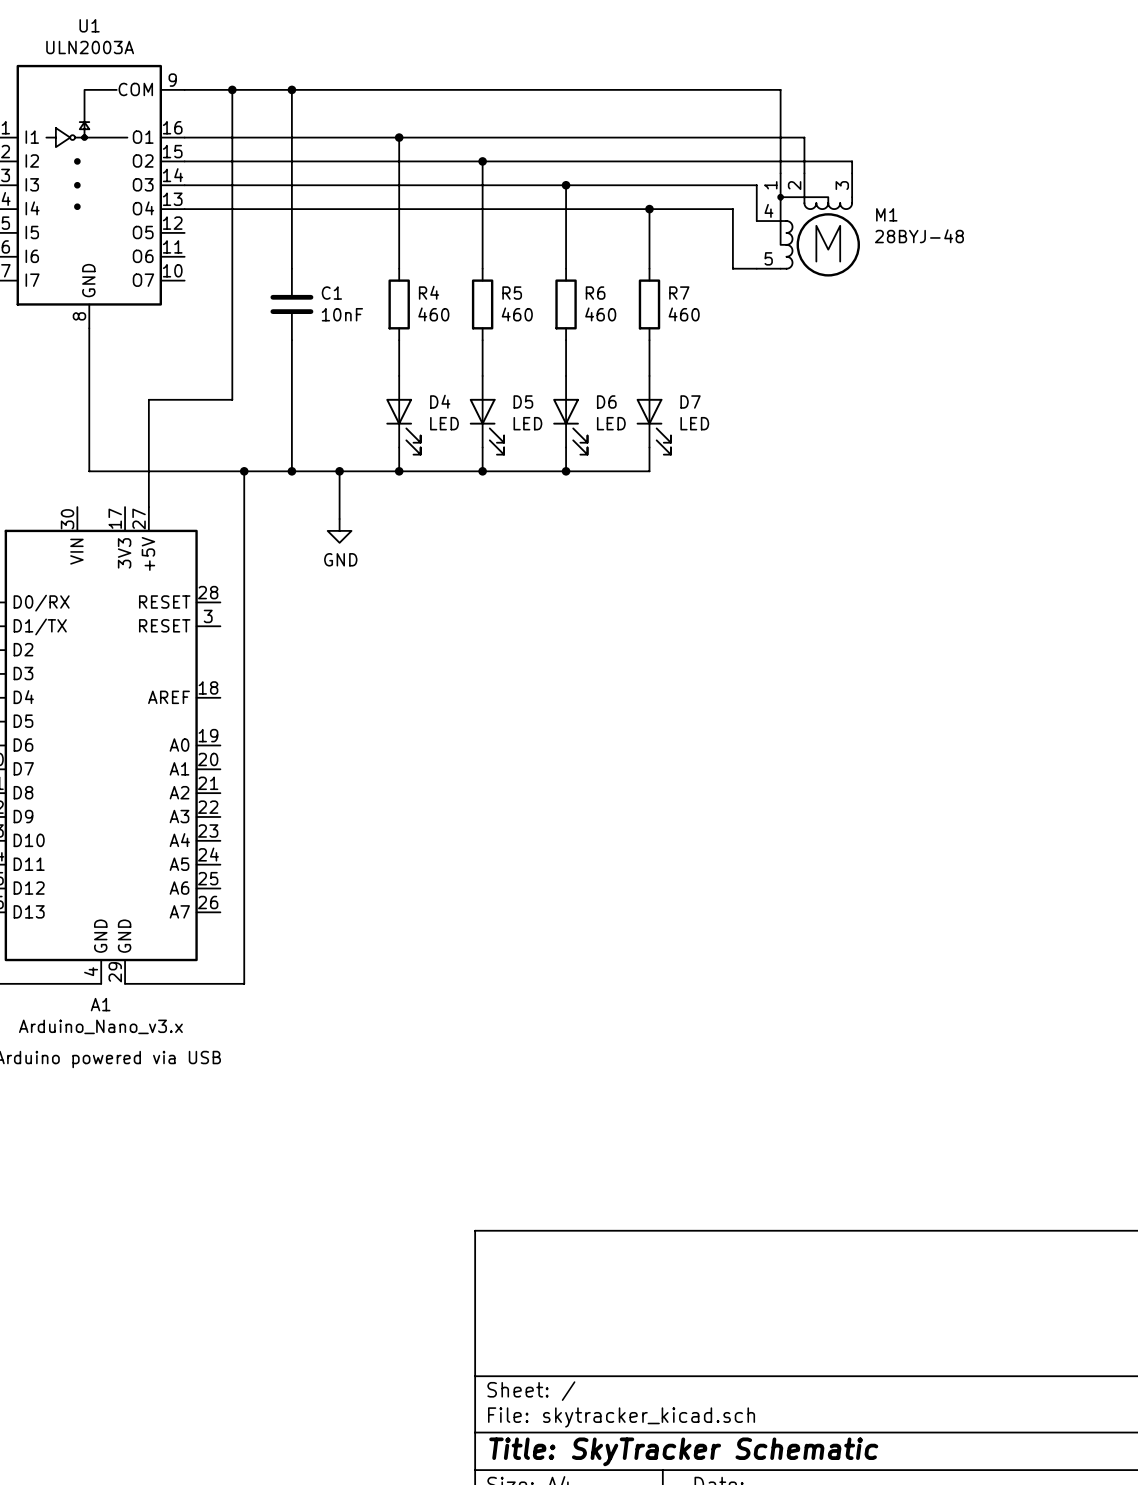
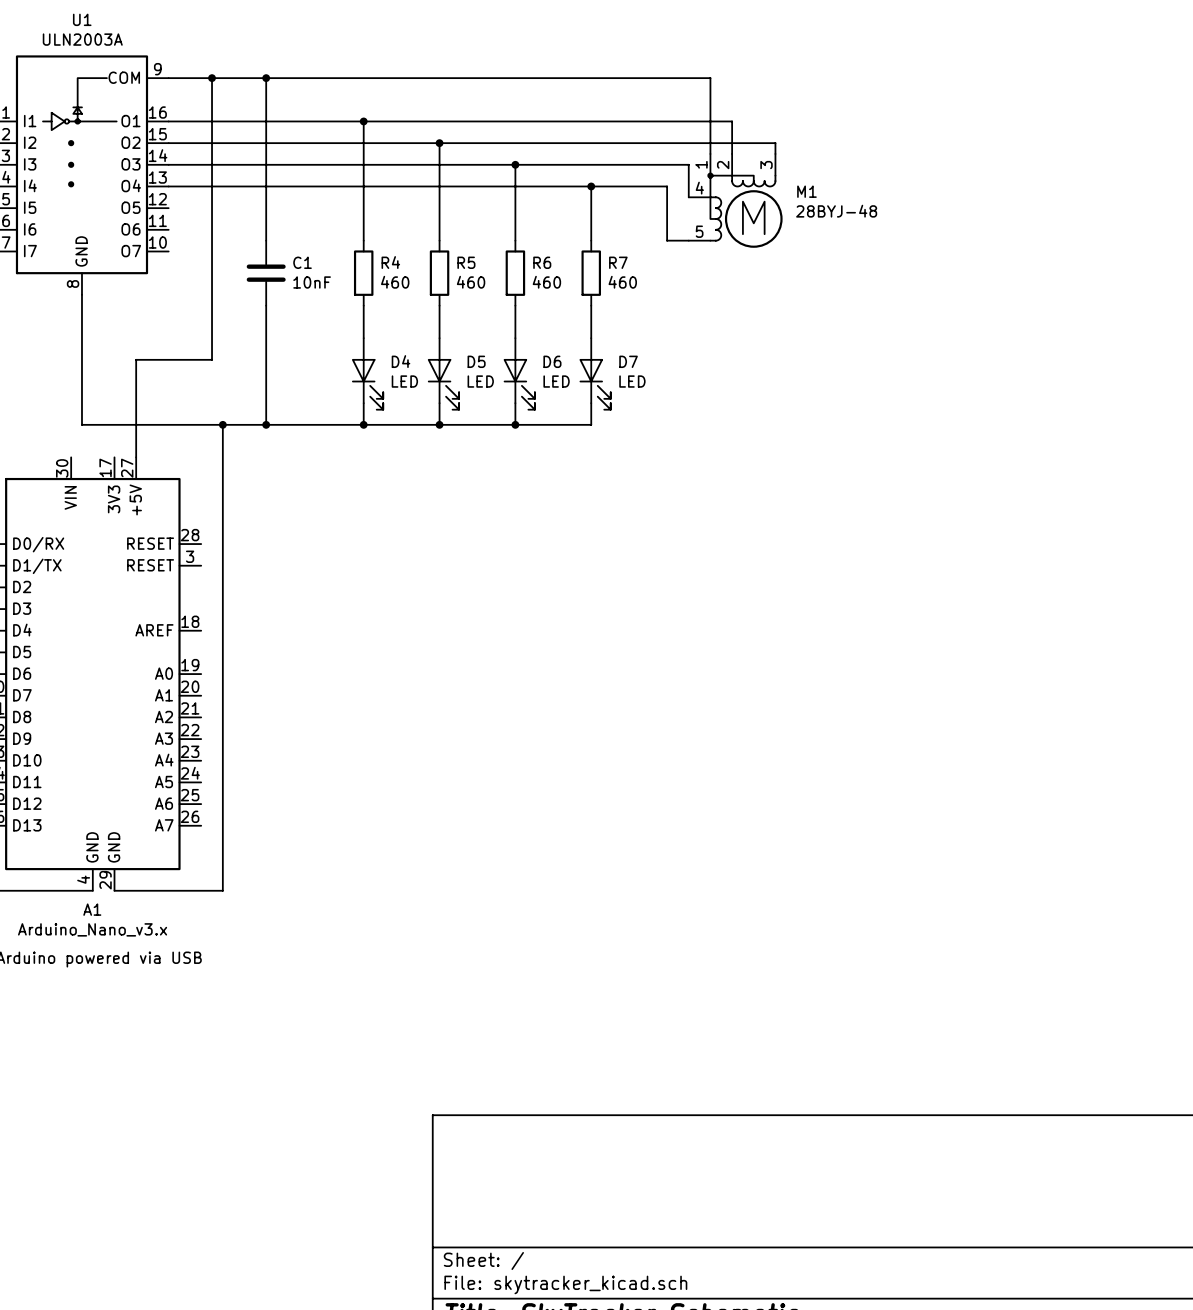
wire: (339, 471) (339, 519) -> none
junction: (339, 471) -> none
power symbol: GND (339, 530) -> none

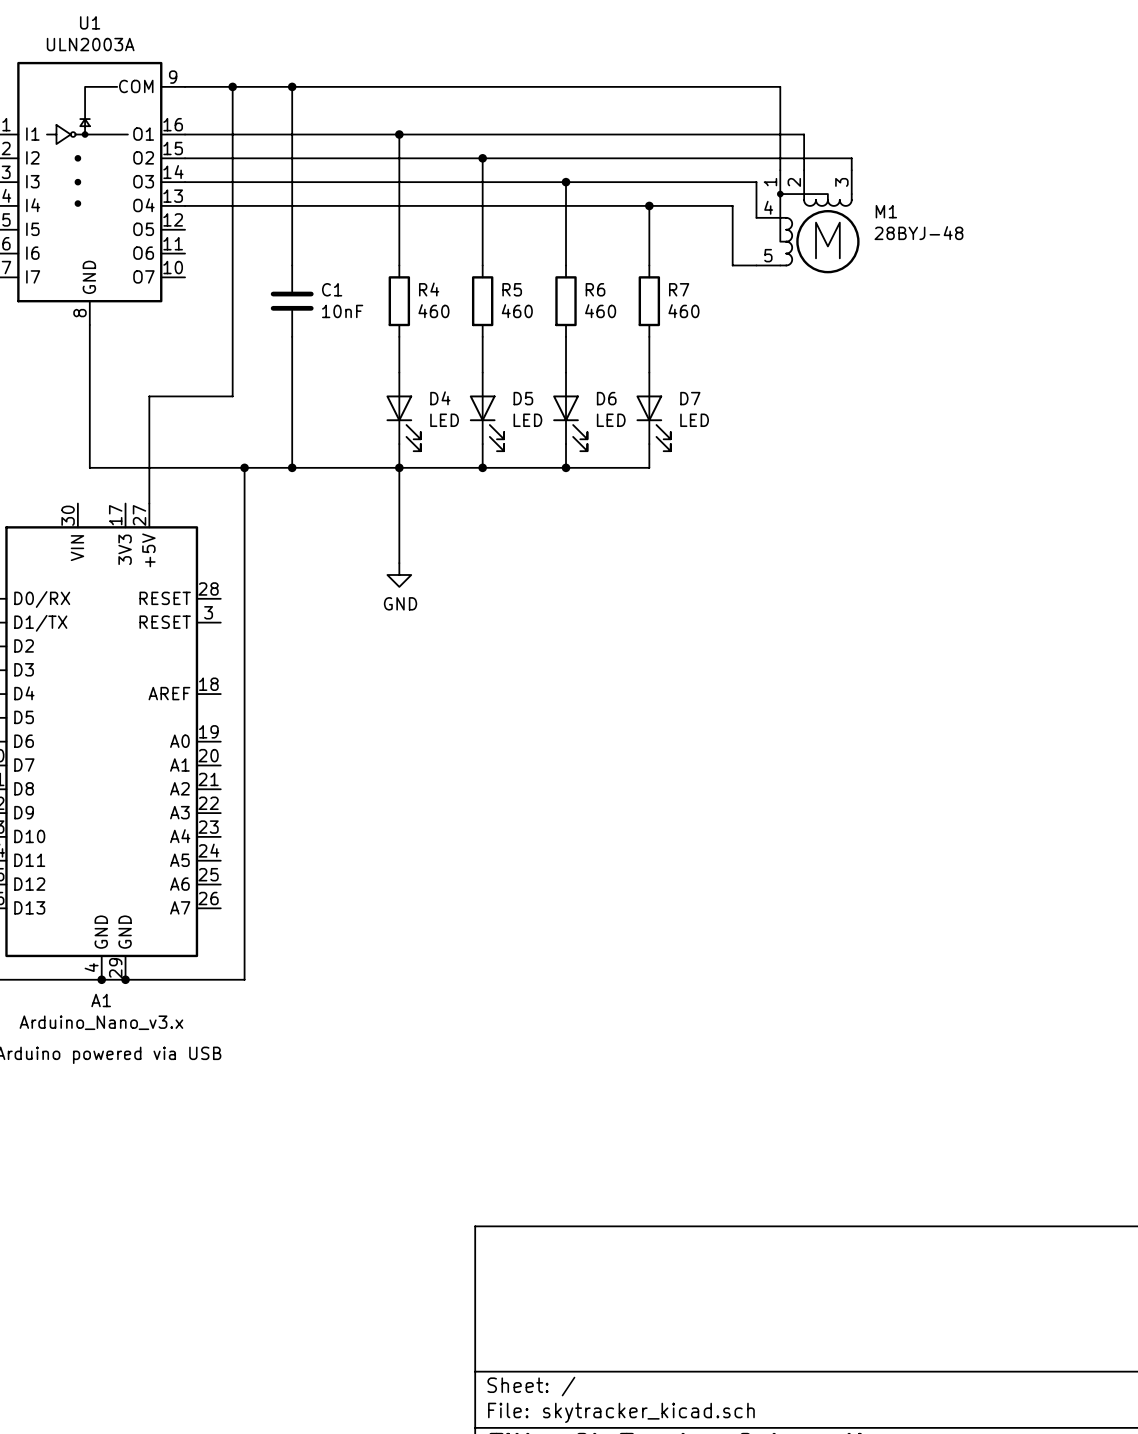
wire: none -> (399, 467) (399, 563)
power symbol: none -> GND (399, 574)
wire: none -> (101, 979) (125, 979)
junction: none -> (101, 979)
junction: none -> (125, 979)

